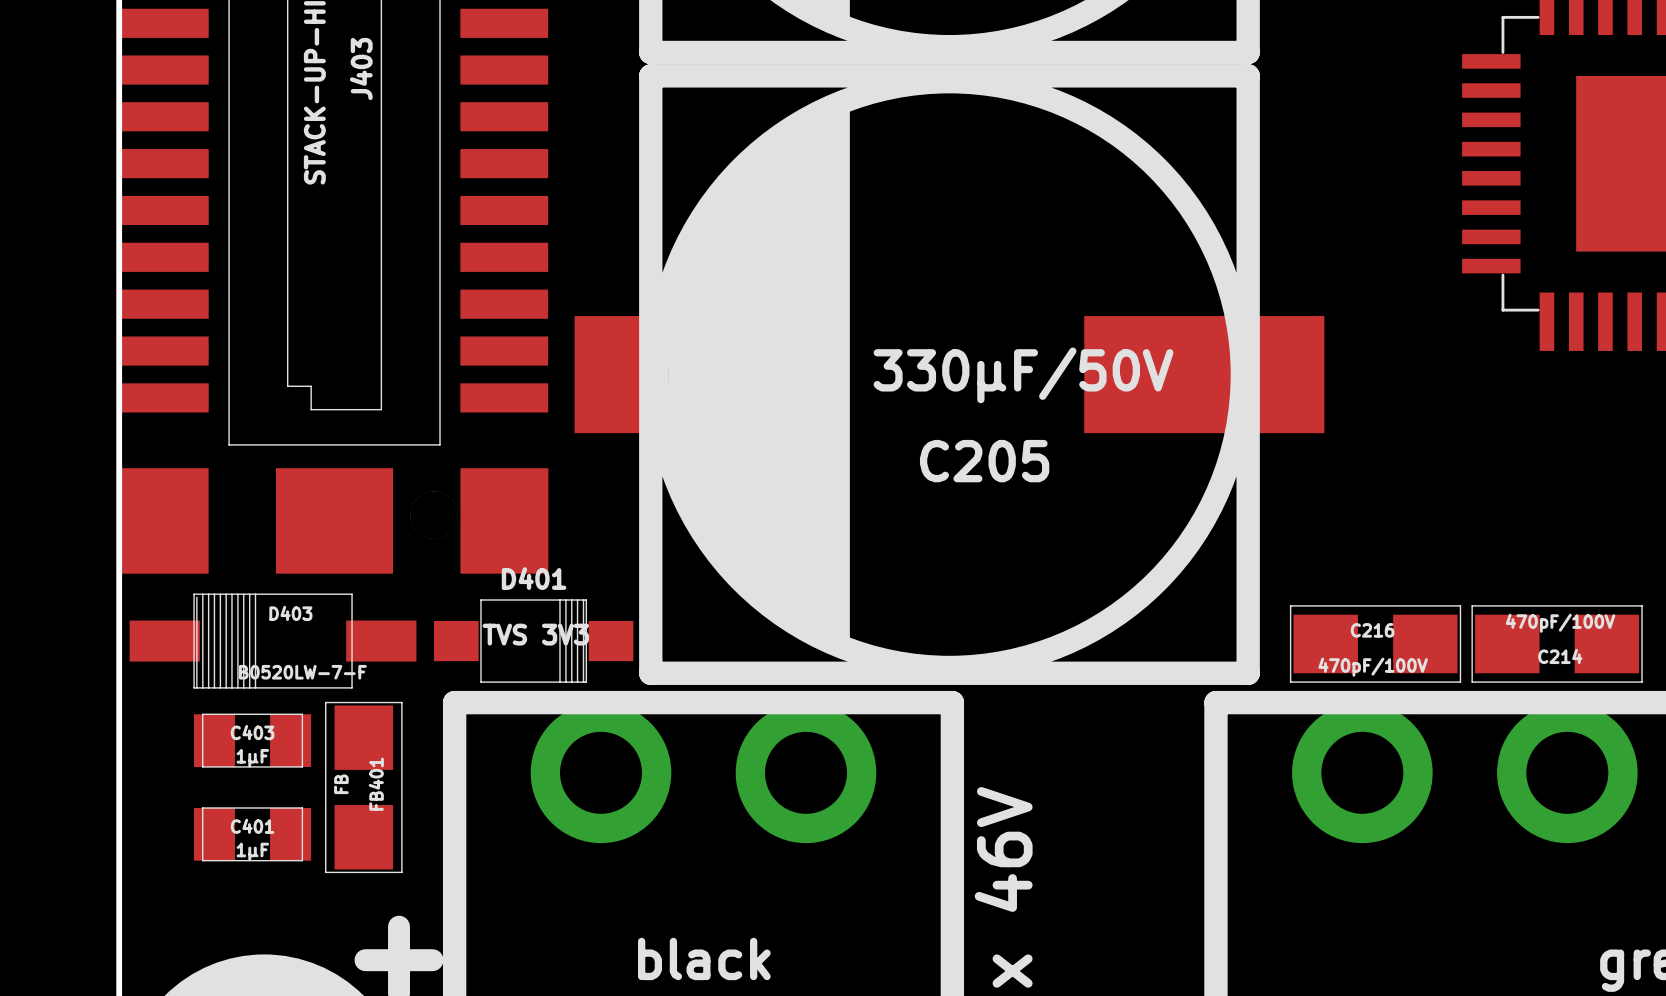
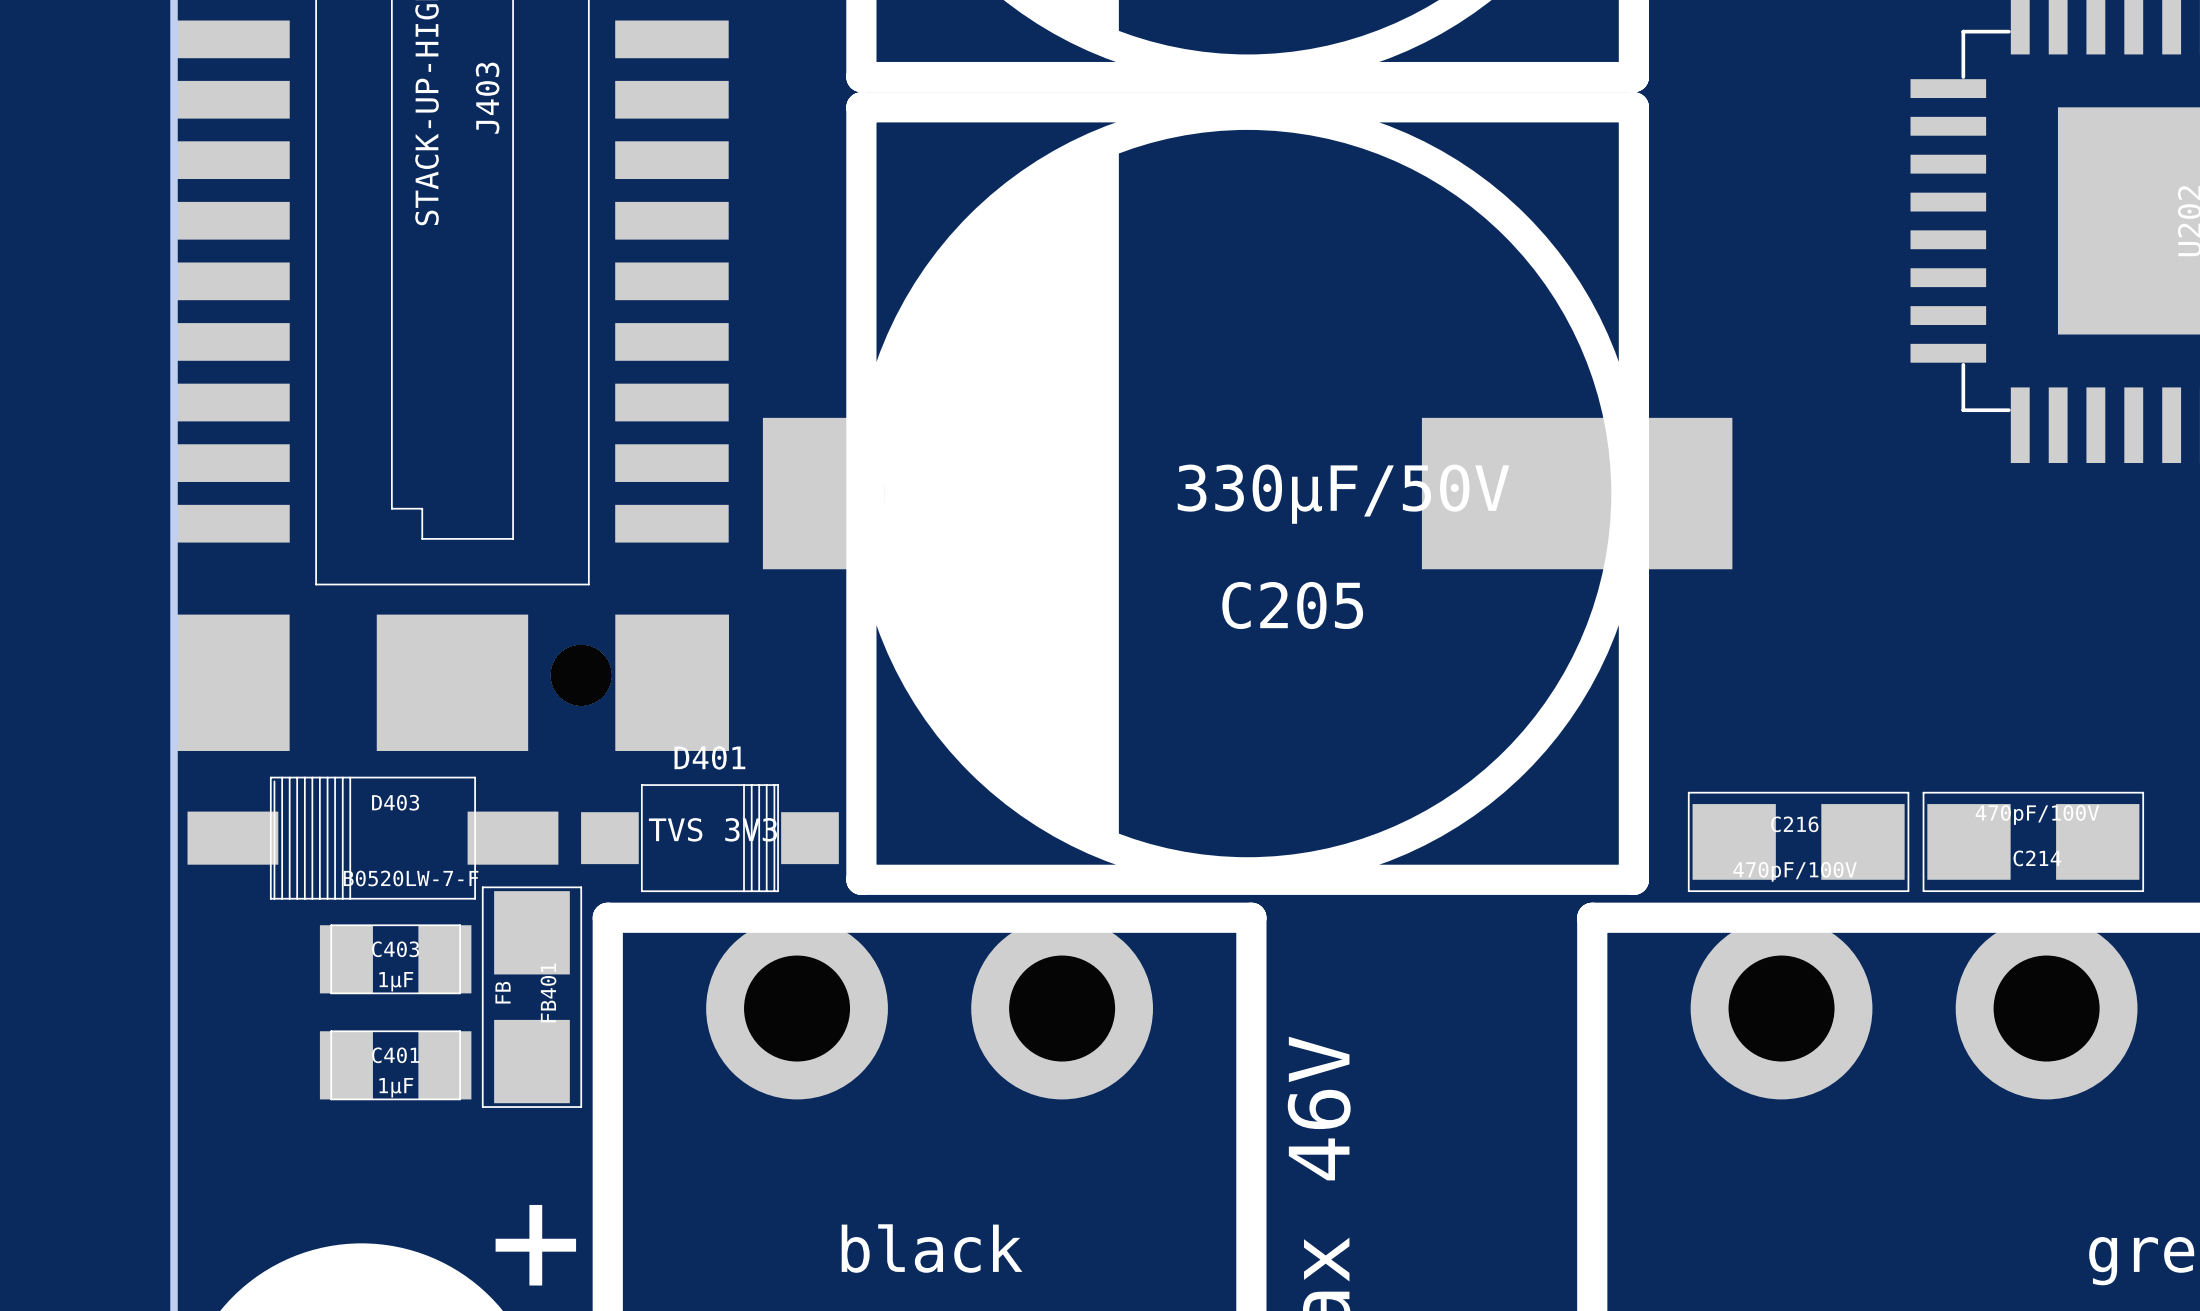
C403 position: (252, 740) -> (395, 959)
FB401 position: (363, 787) -> (531, 997)
C401 position: (252, 834) -> (395, 1065)

